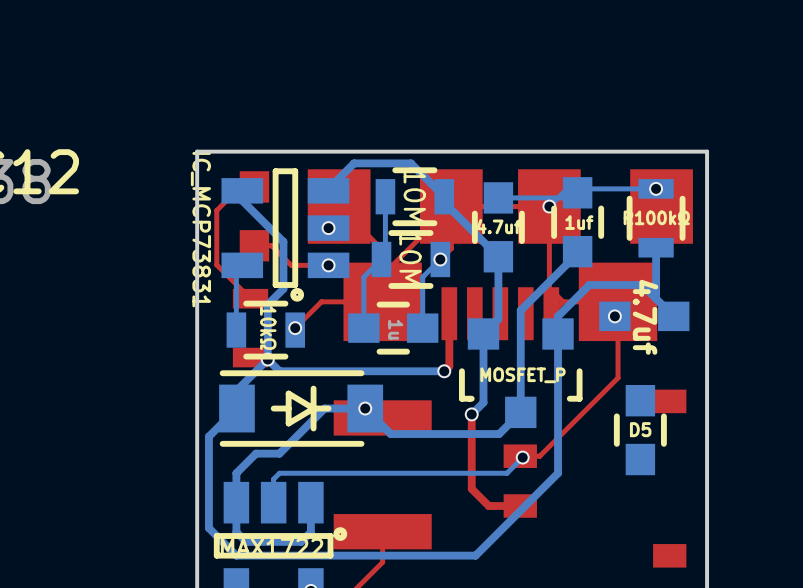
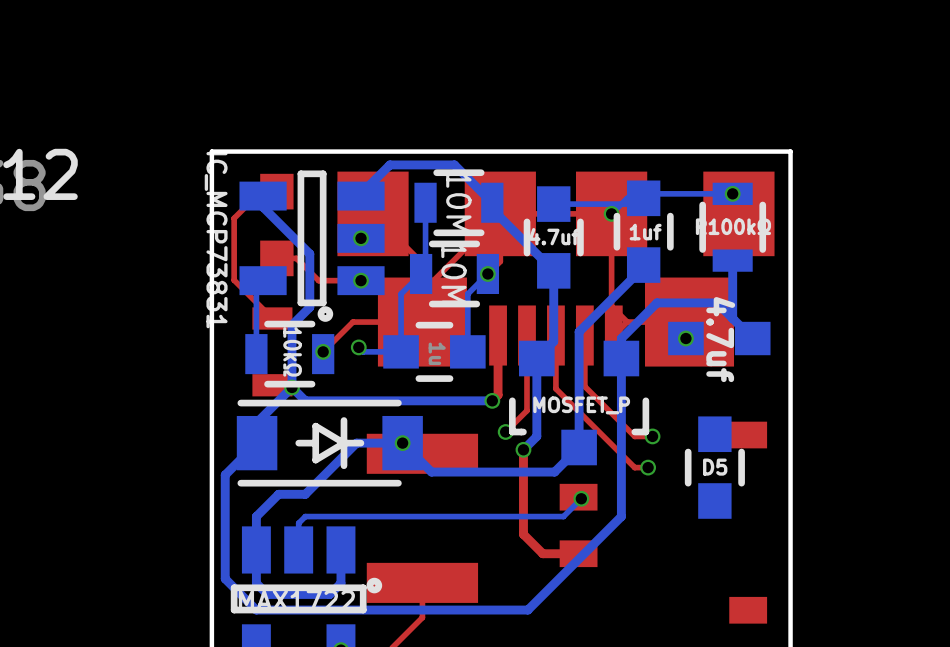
top track: (618, 301) (618, 377) (539, 456) (520, 456) -> none
top track: none -> (526, 335) (526, 410) (505, 431)
top track: none -> (555, 335) (555, 388) (634, 467) (648, 467)
top track: none -> (584, 335) (584, 386) (634, 436) (652, 436)
bottom track: none -> (358, 347) (363, 351) (401, 351)
via: none -> (358, 347)
via: none -> (505, 431)
via: none -> (652, 436)
via: none -> (648, 467)

